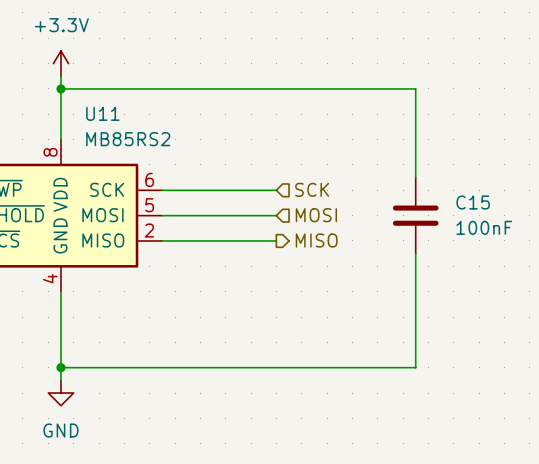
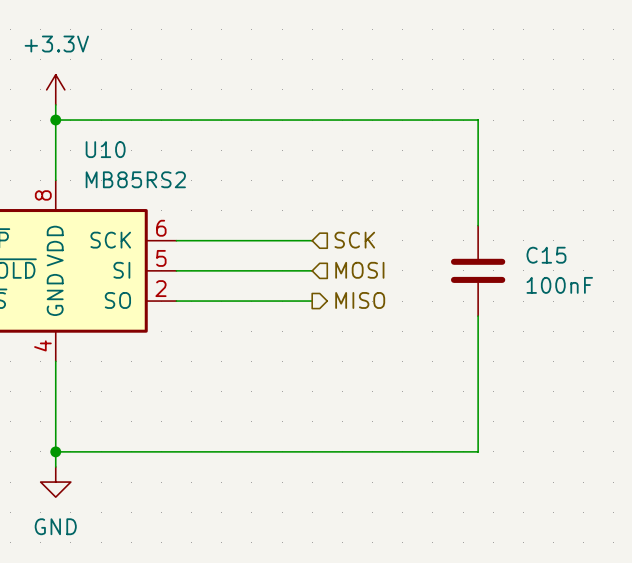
U11 name: U11 (102, 113) -> U10 (105, 149)
U11 pin name: MOSI (102, 215) -> SI (121, 270)
U11 pin name: MISO (103, 240) -> SO (117, 300)

